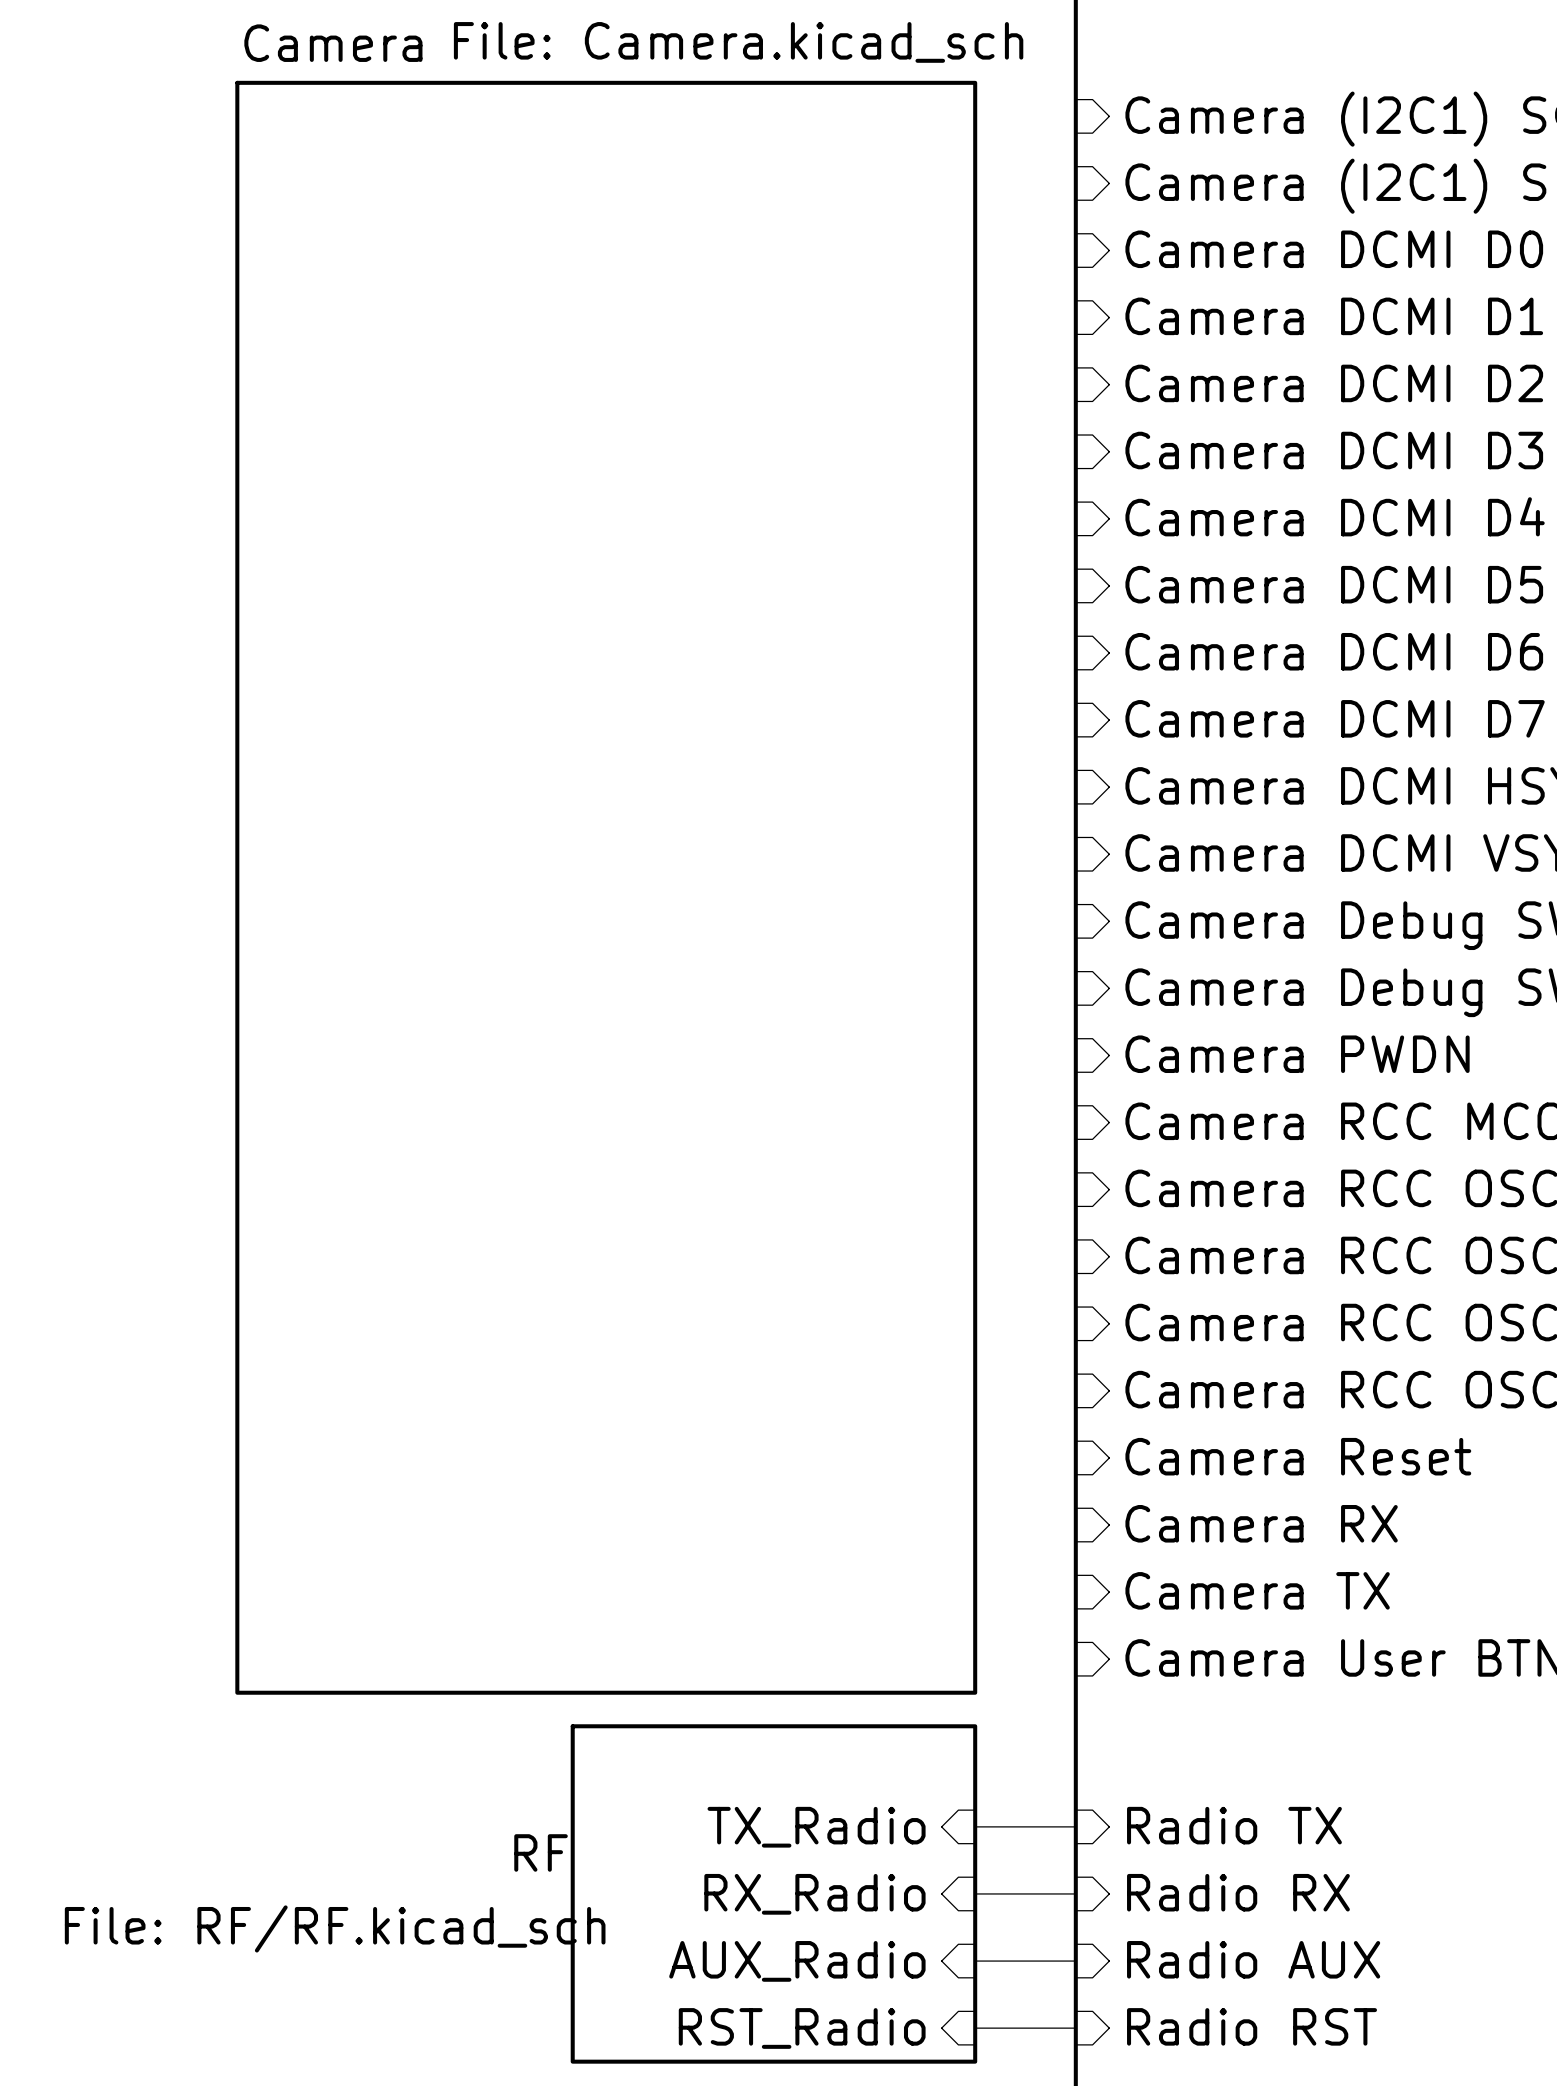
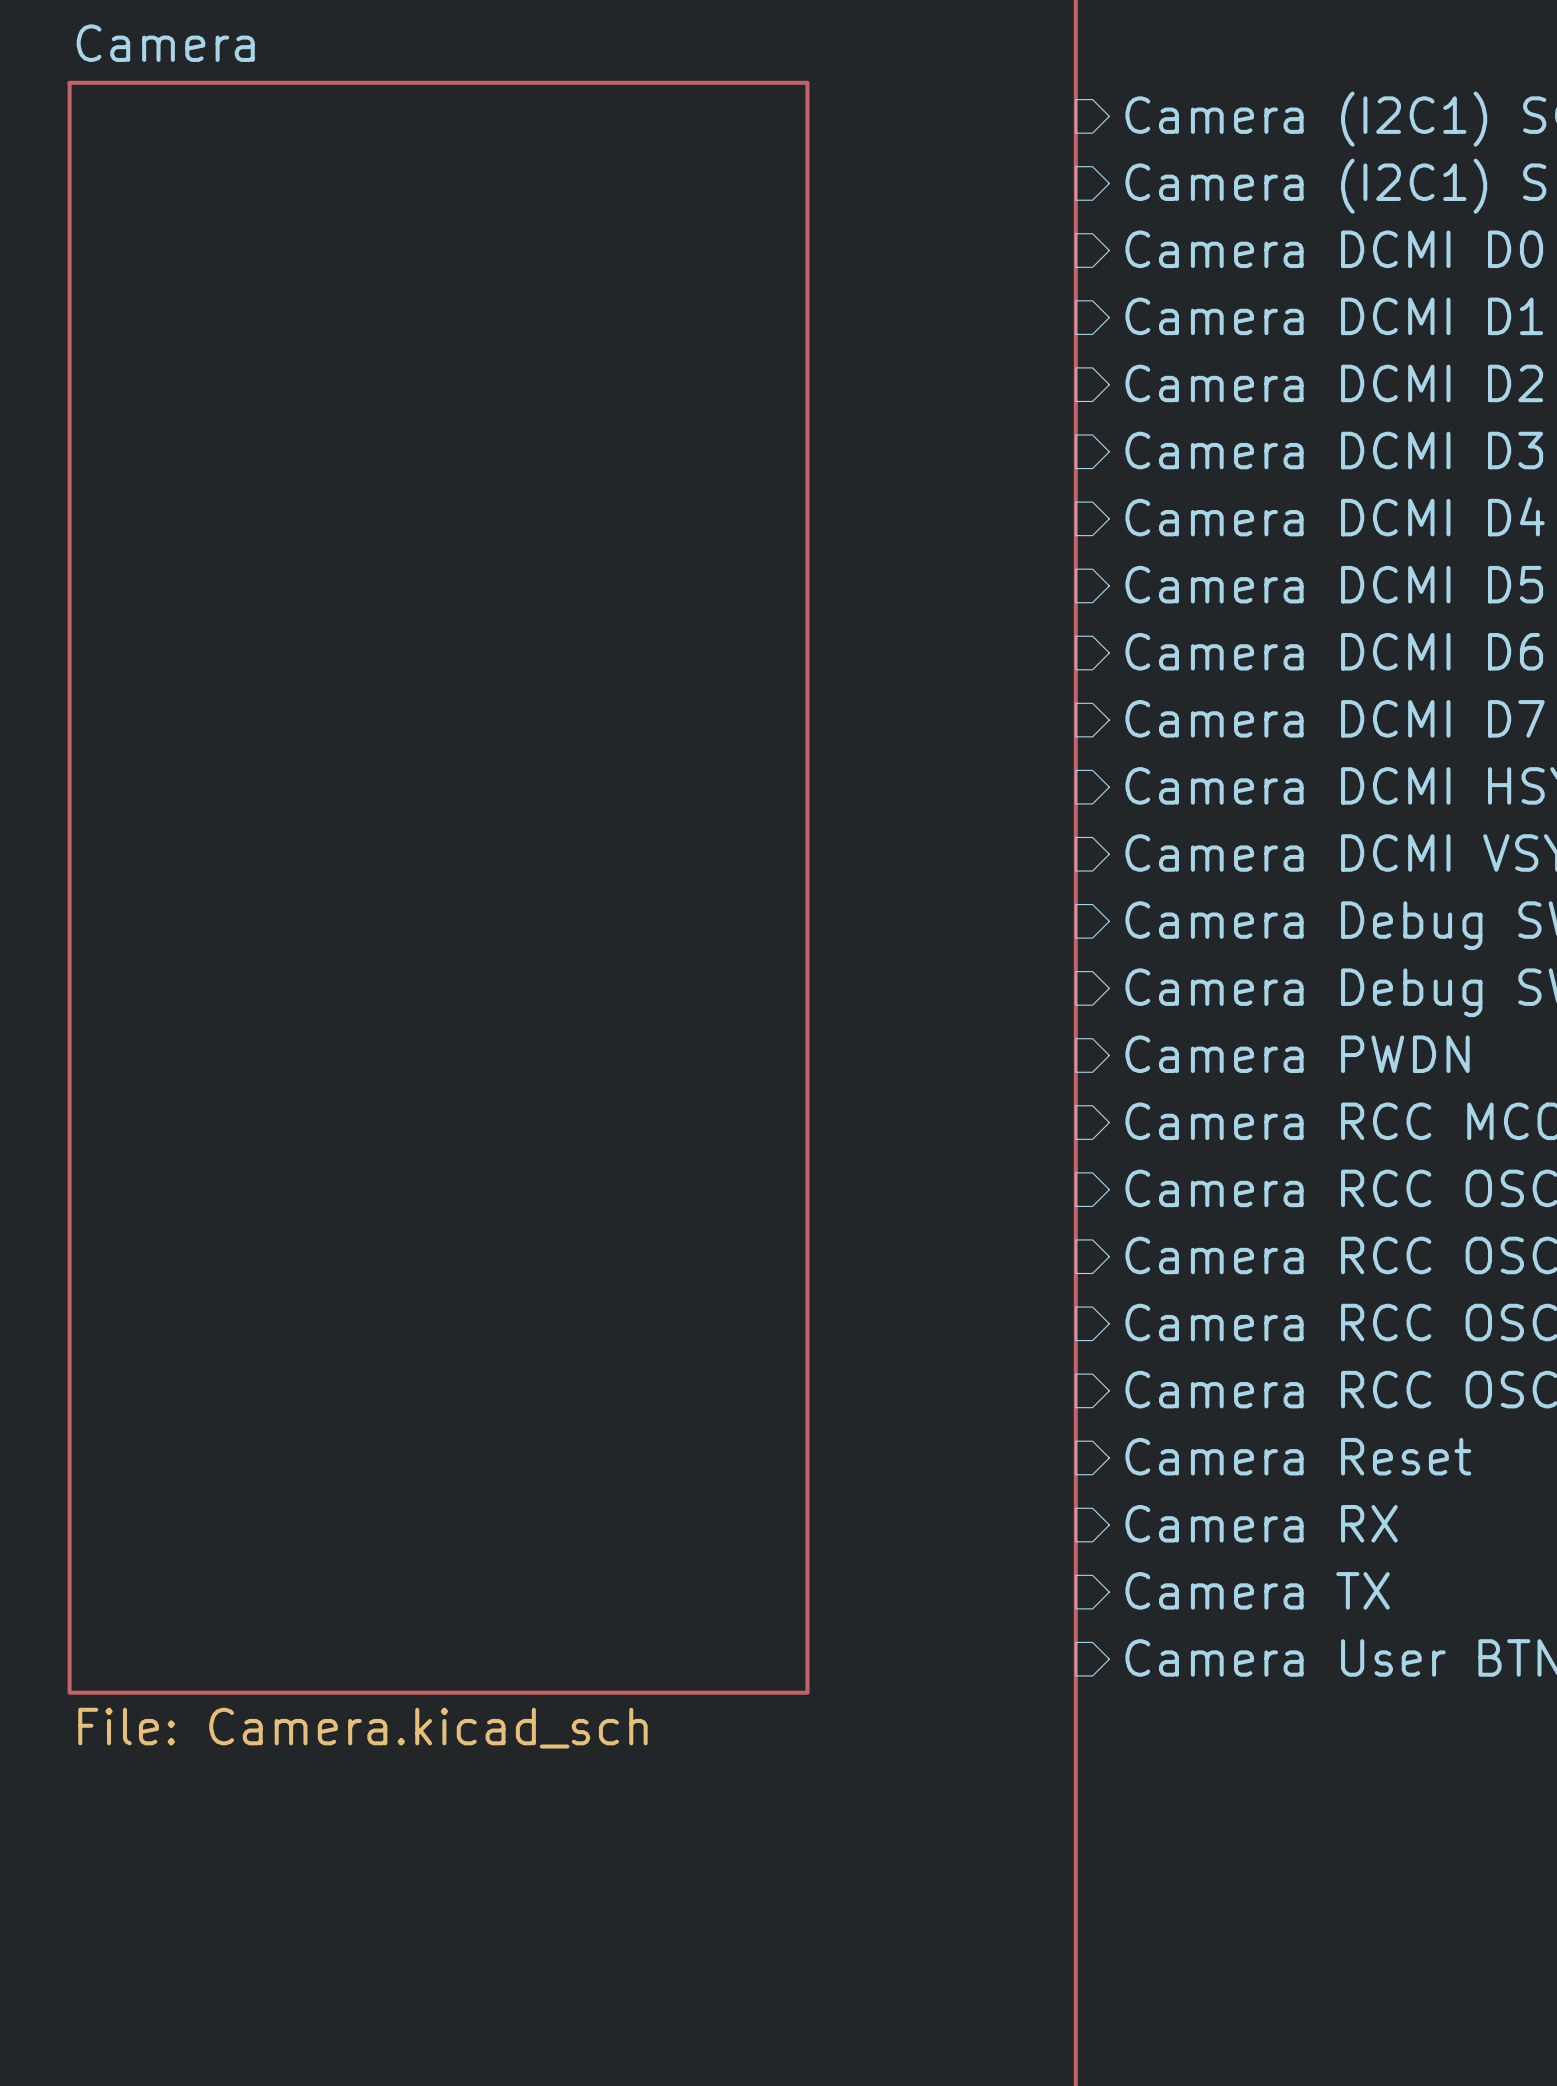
sheet Camera value position: File: Camera.kicad_sch (738, 42) -> File: Camera.kicad_sch (362, 1728)
sheet Camera position: (606, 887) -> (438, 887)
sheet pin: Radio TX (1234, 1825) -> none
wire: (975, 1826) (1075, 1826) -> none
sheet pin: TX_Radio (816, 1827) -> none
sheet pin: Radio RX (1238, 1892) -> none
sheet RF: File: RF/RF.kicad_sch (773, 1893) -> none
wire: (975, 1893) (1075, 1893) -> none
sheet pin: RX_Radio (814, 1894) -> none
sheet pin: Radio AUX (1253, 1959) -> none
sheet pin: AUX_Radio (797, 1961) -> none
wire: (975, 1961) (1075, 1961) -> none
sheet pin: Radio RST (1252, 2026) -> none
sheet pin: RST_Radio (802, 2028) -> none
wire: (975, 2028) (1075, 2028) -> none

